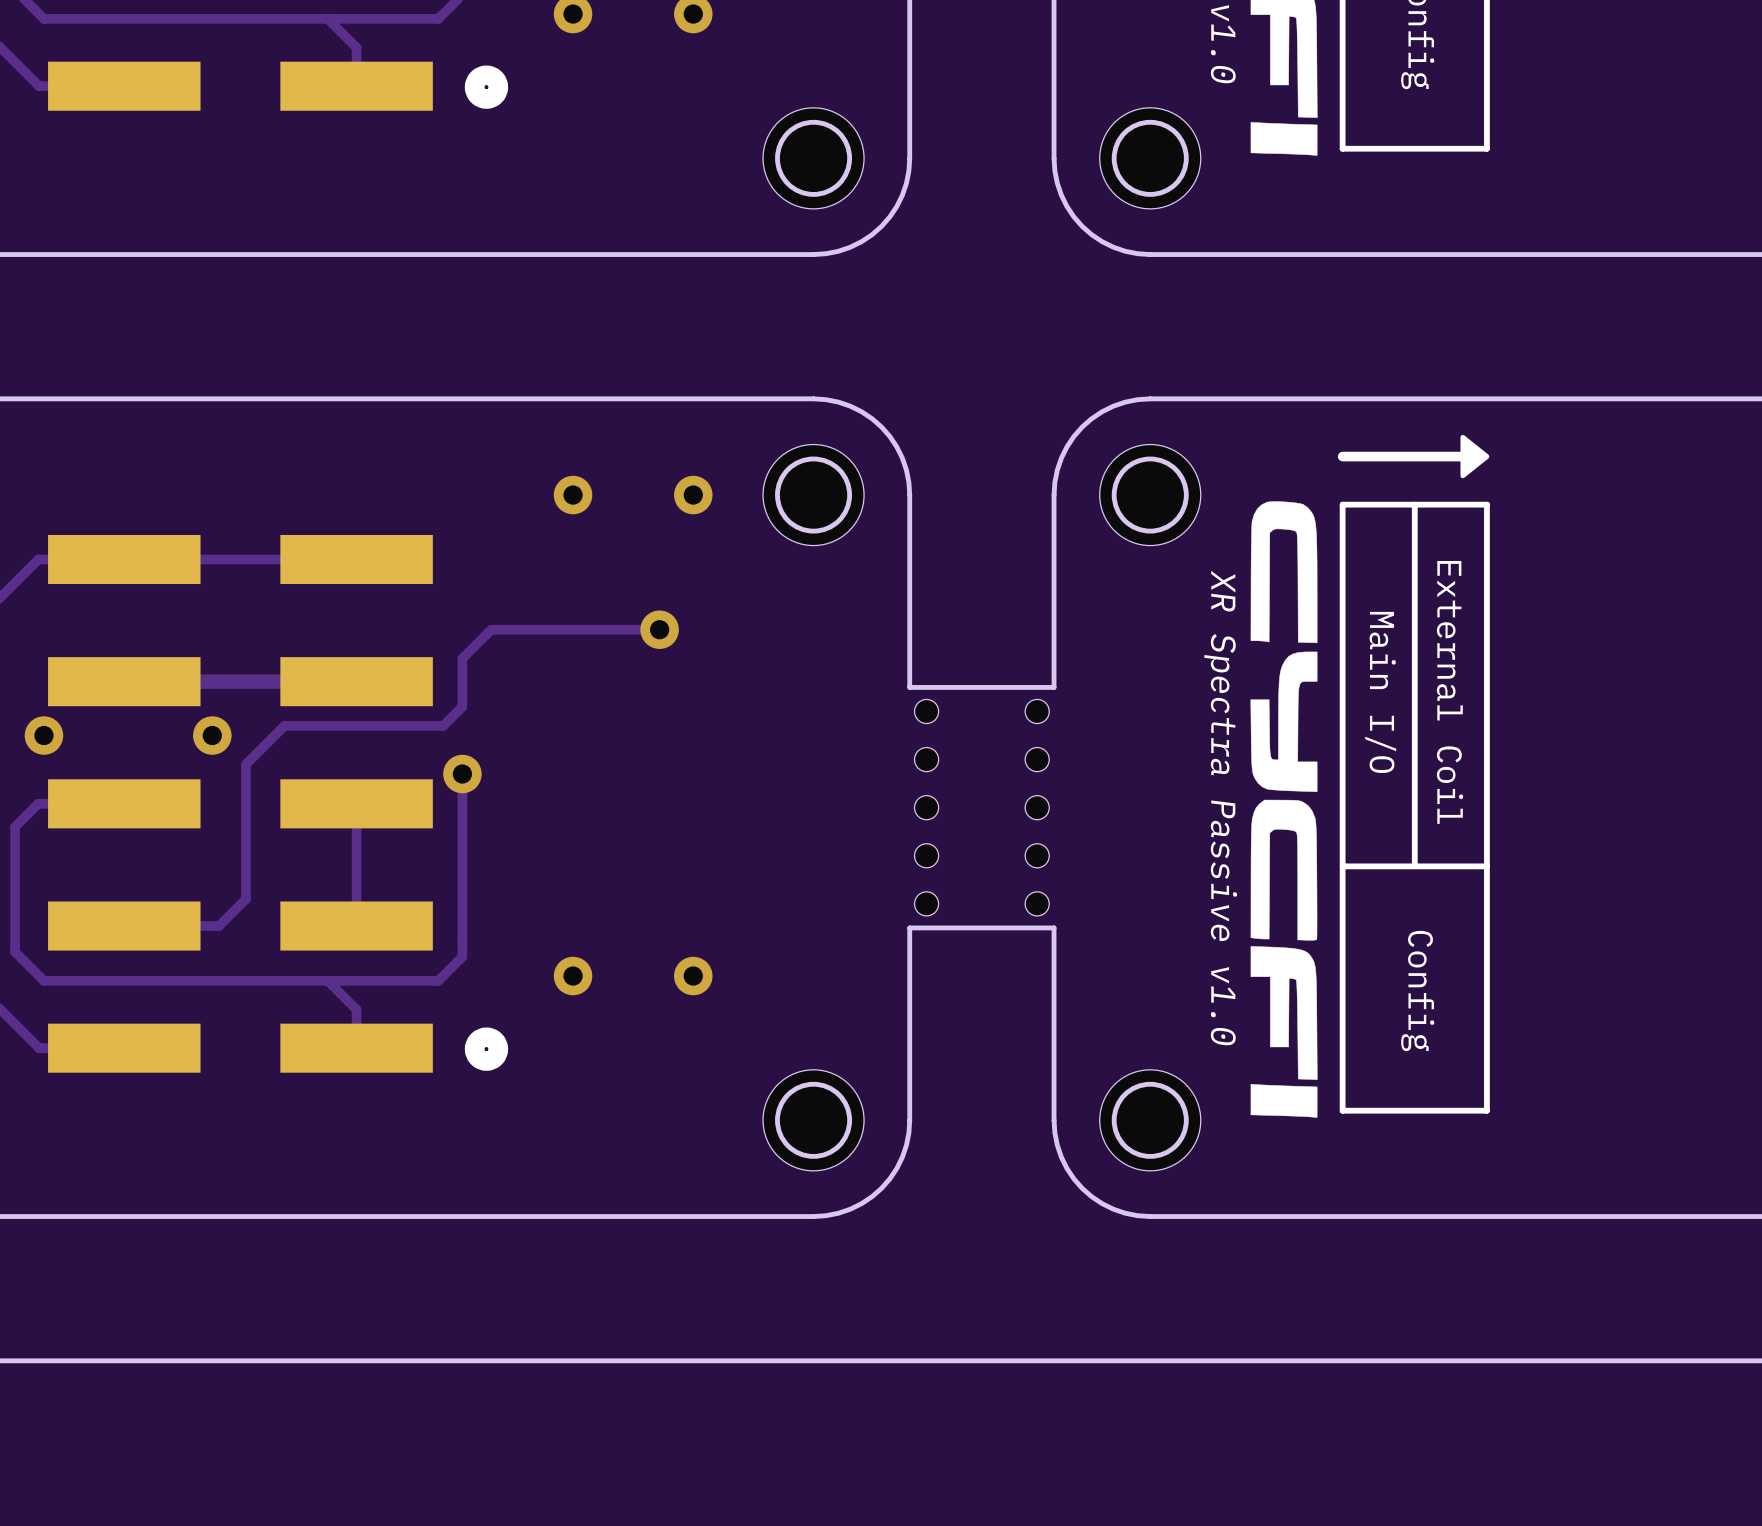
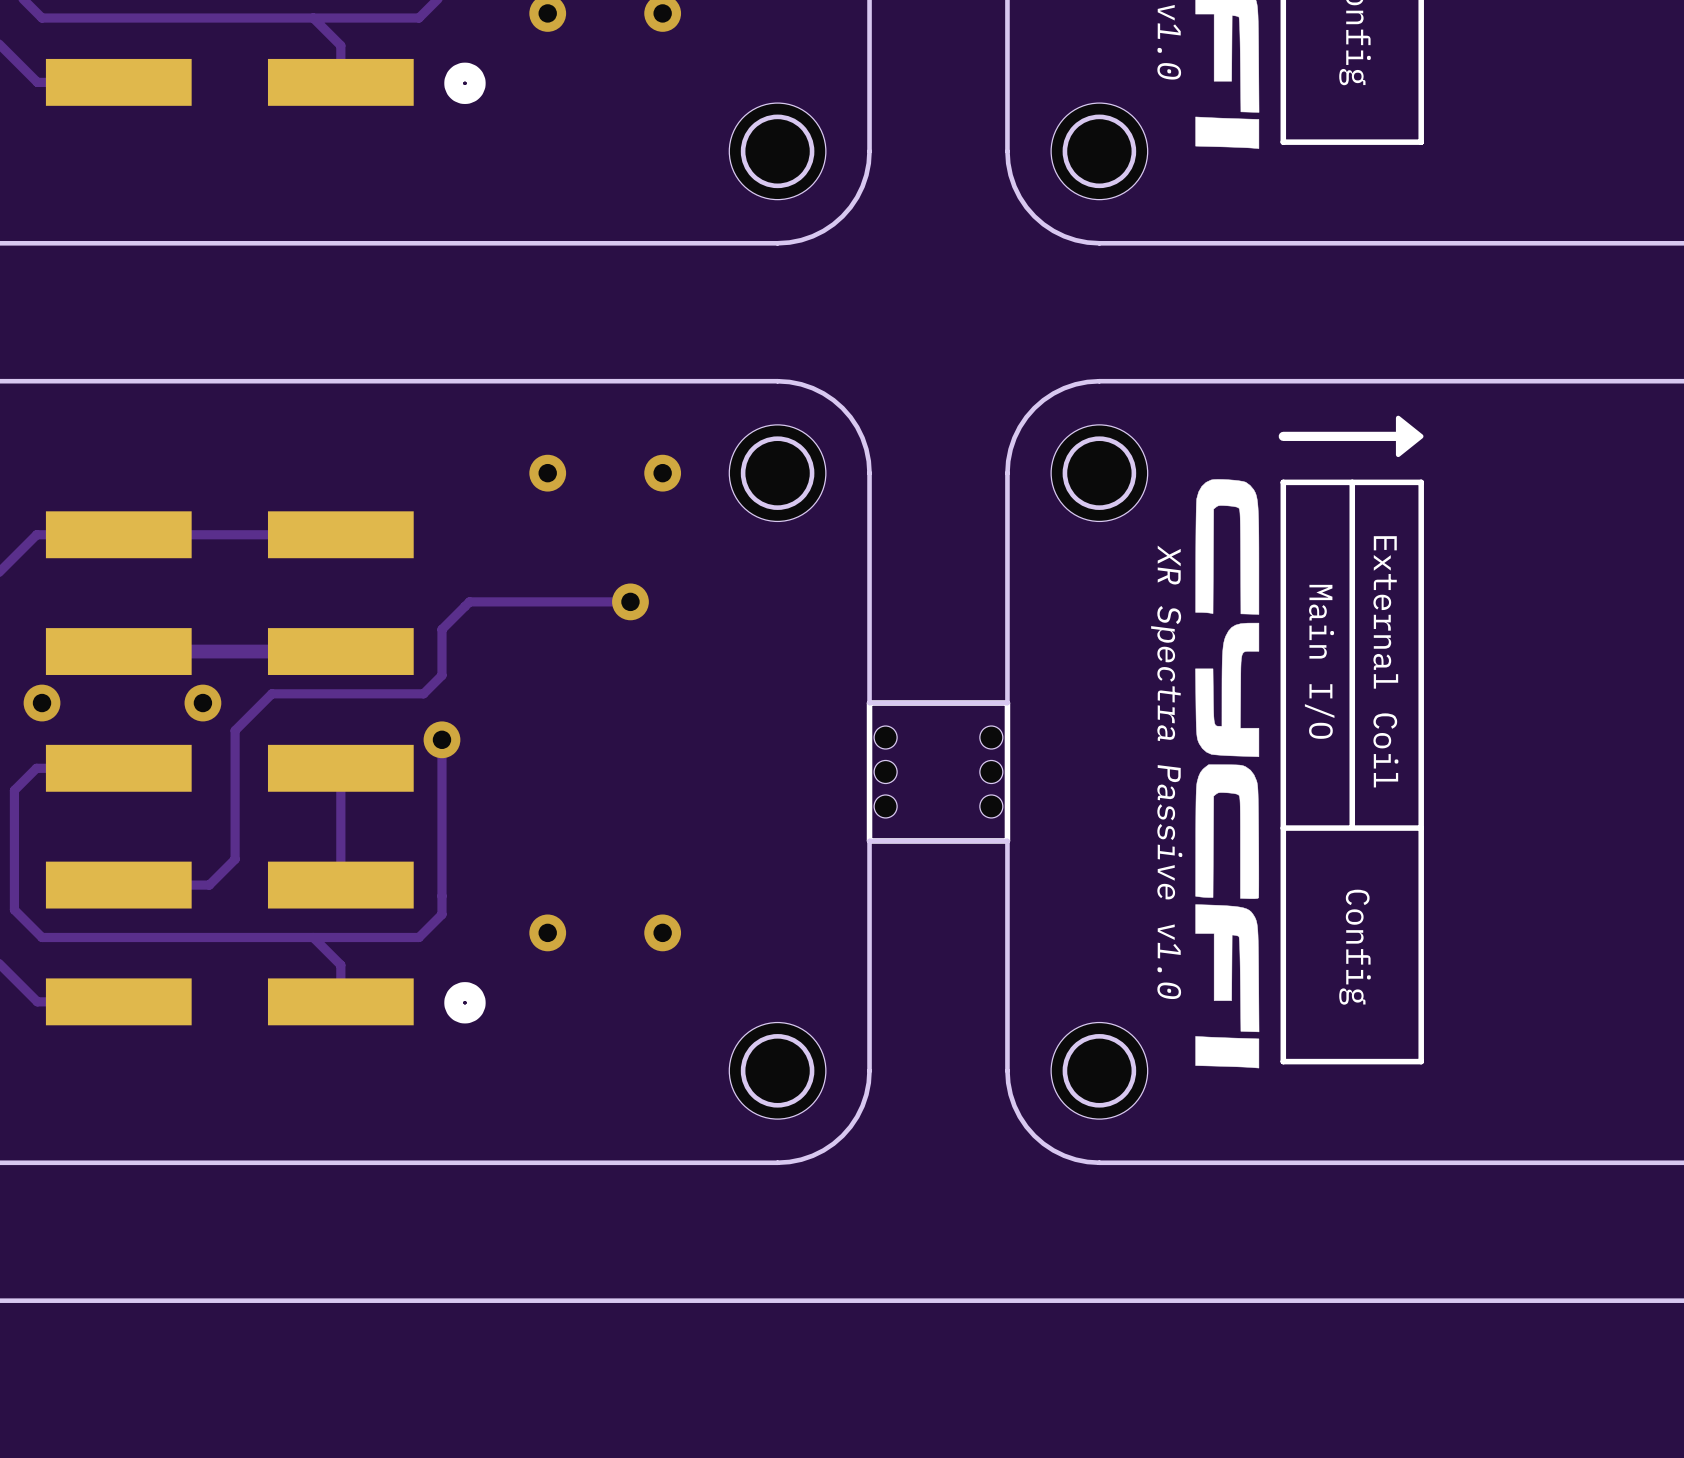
board edge: (909, 687) (1054, 687) -> (869, 657) (869, 703) (1007, 703) (1007, 657)
part footprint: [914, 699, 1050, 916] -> [866, 700, 1011, 844]
board edge: (909, 927) (1054, 927) -> (869, 886) (869, 840) (1007, 840) (1007, 886)

